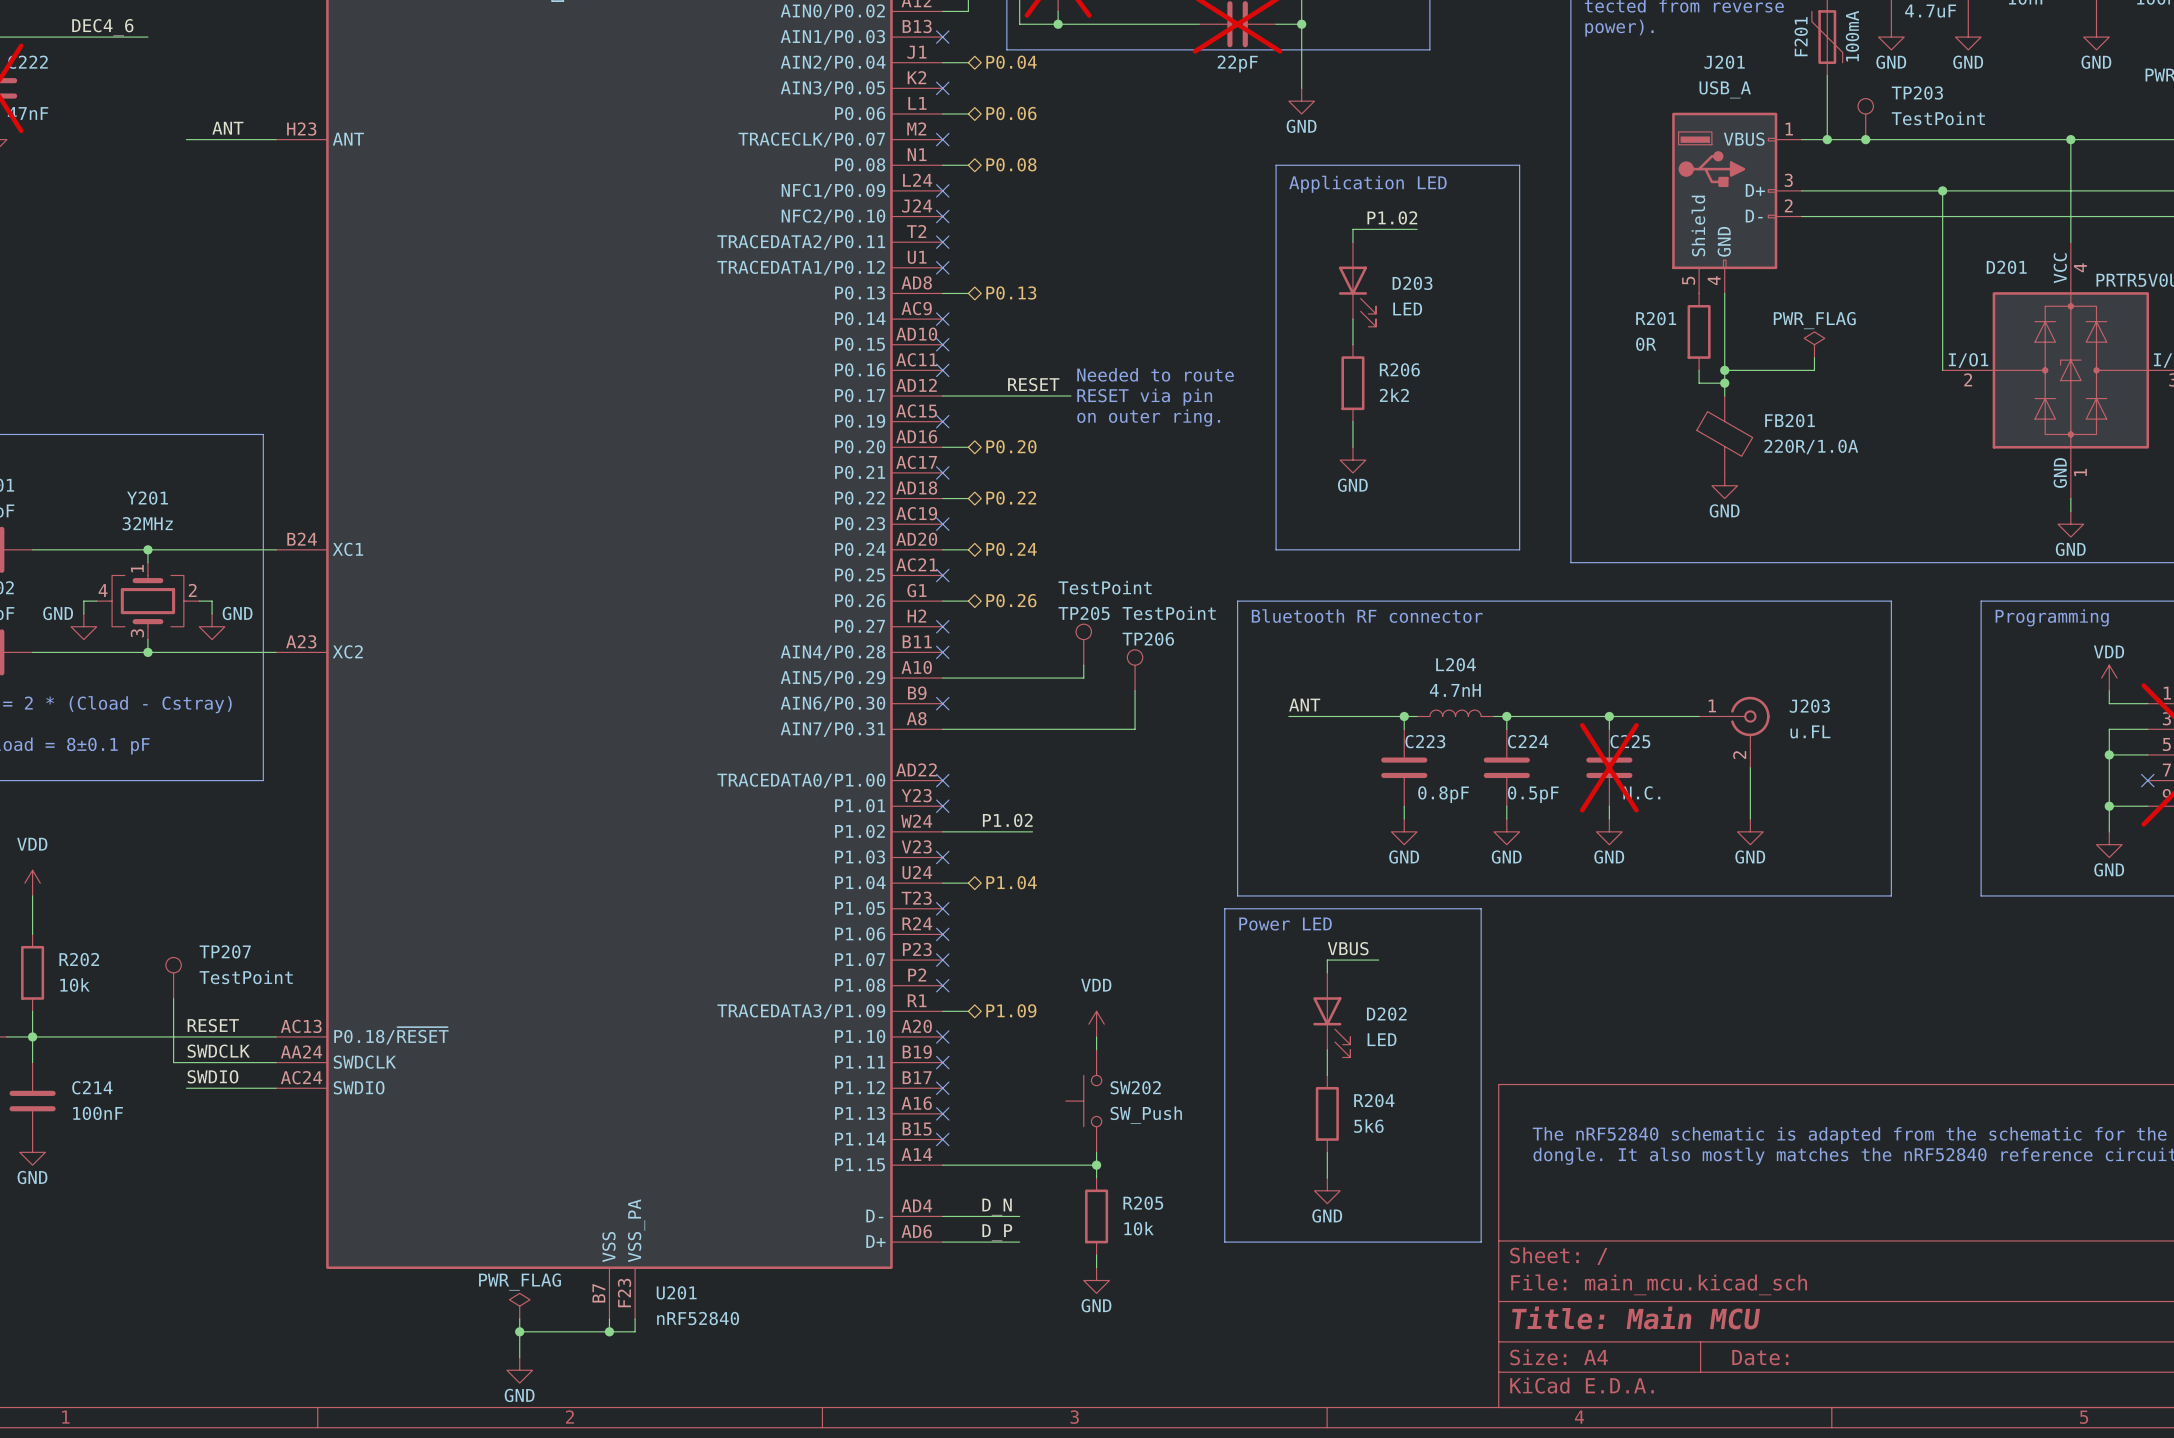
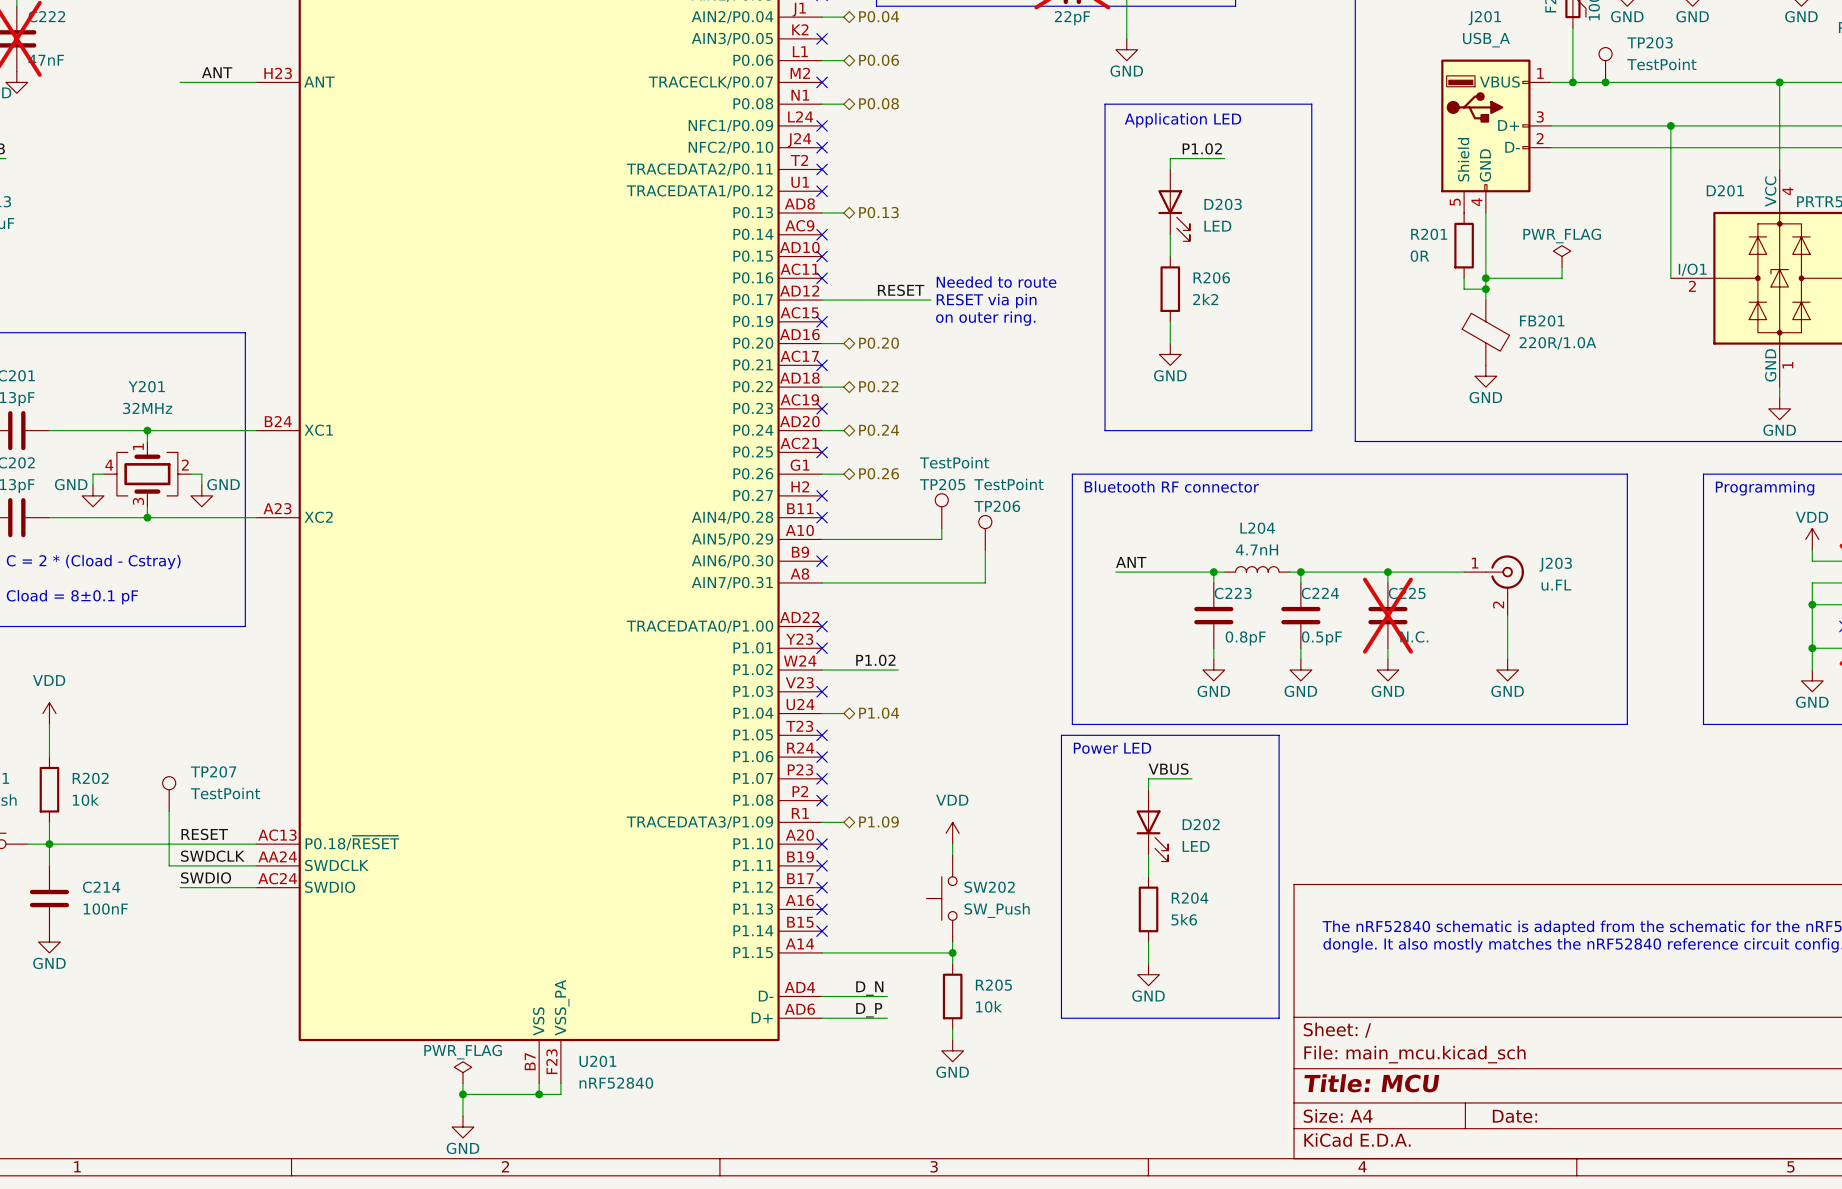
title block: Title: Main MCU (1636, 1317) -> Title: MCU (1371, 1083)

